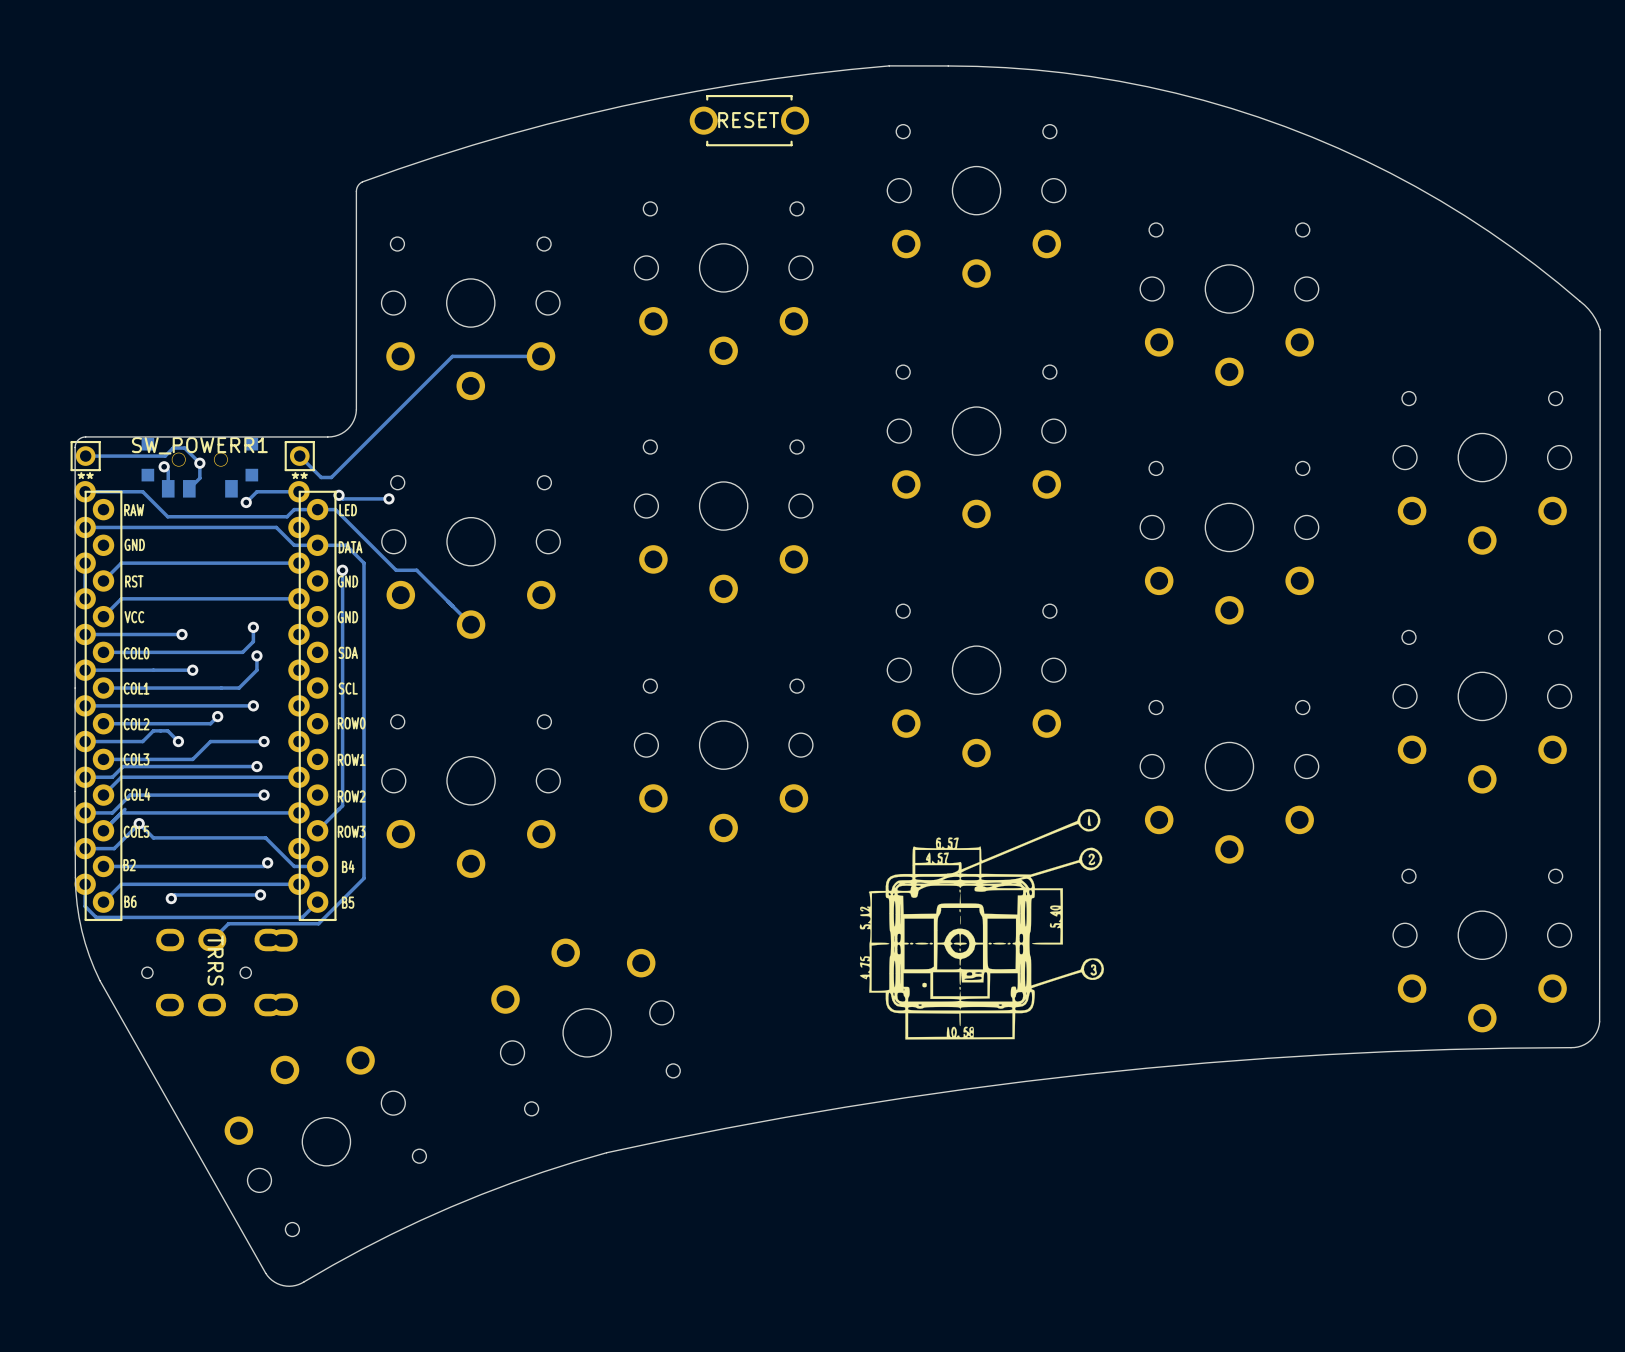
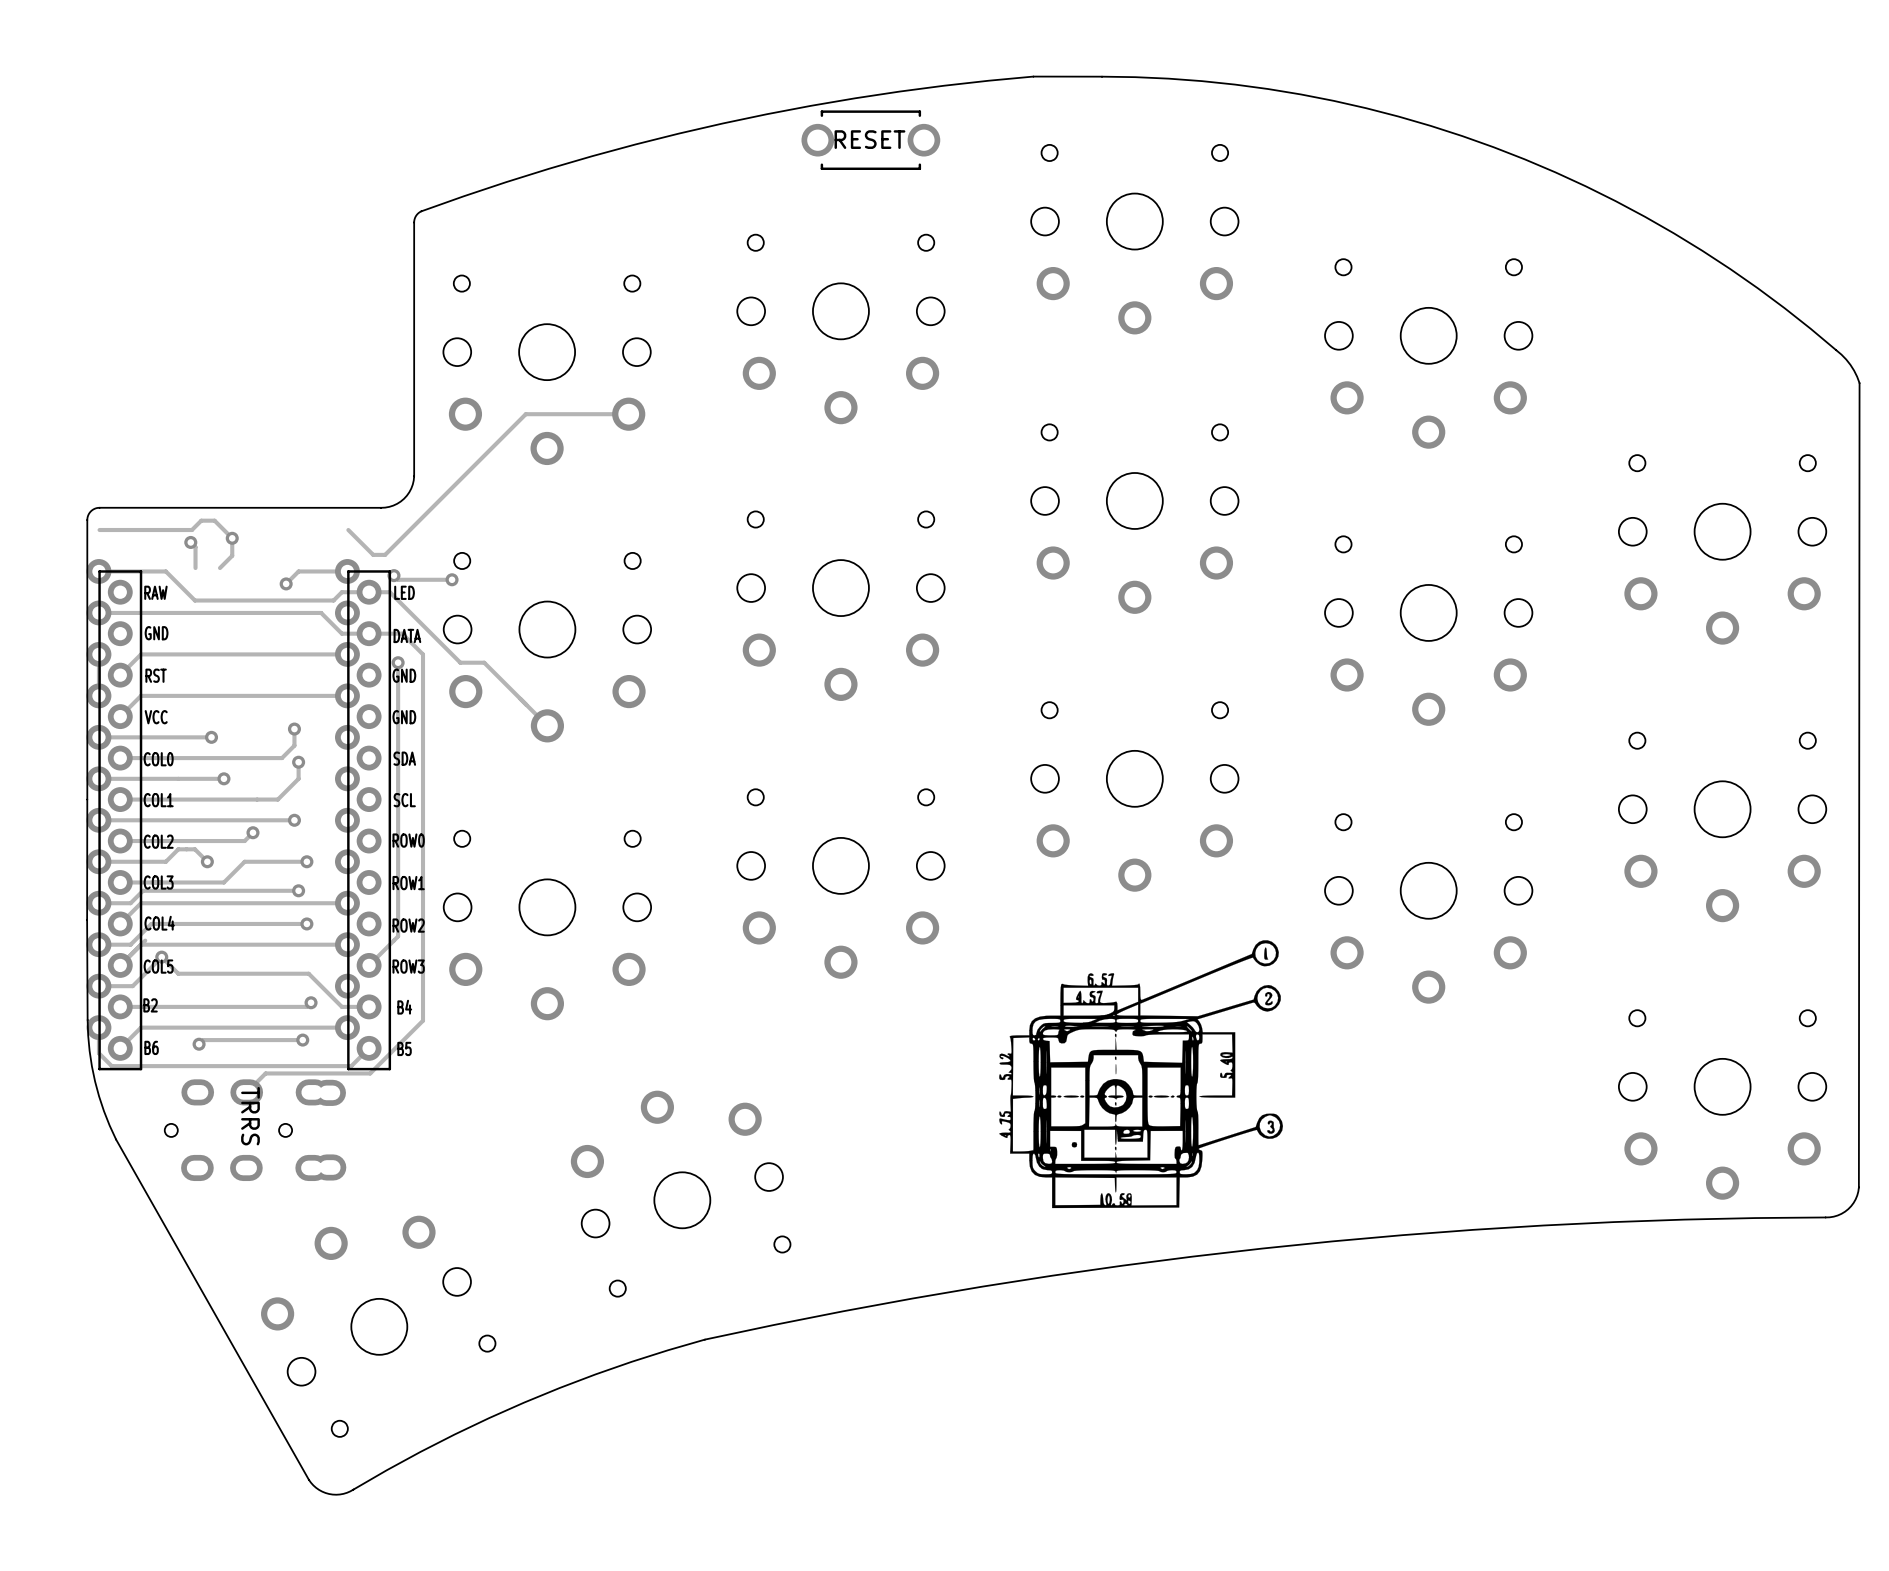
part: (85, 456) -> none
part: (299, 456) -> none
SW_POWERR1: (199, 467) -> none

